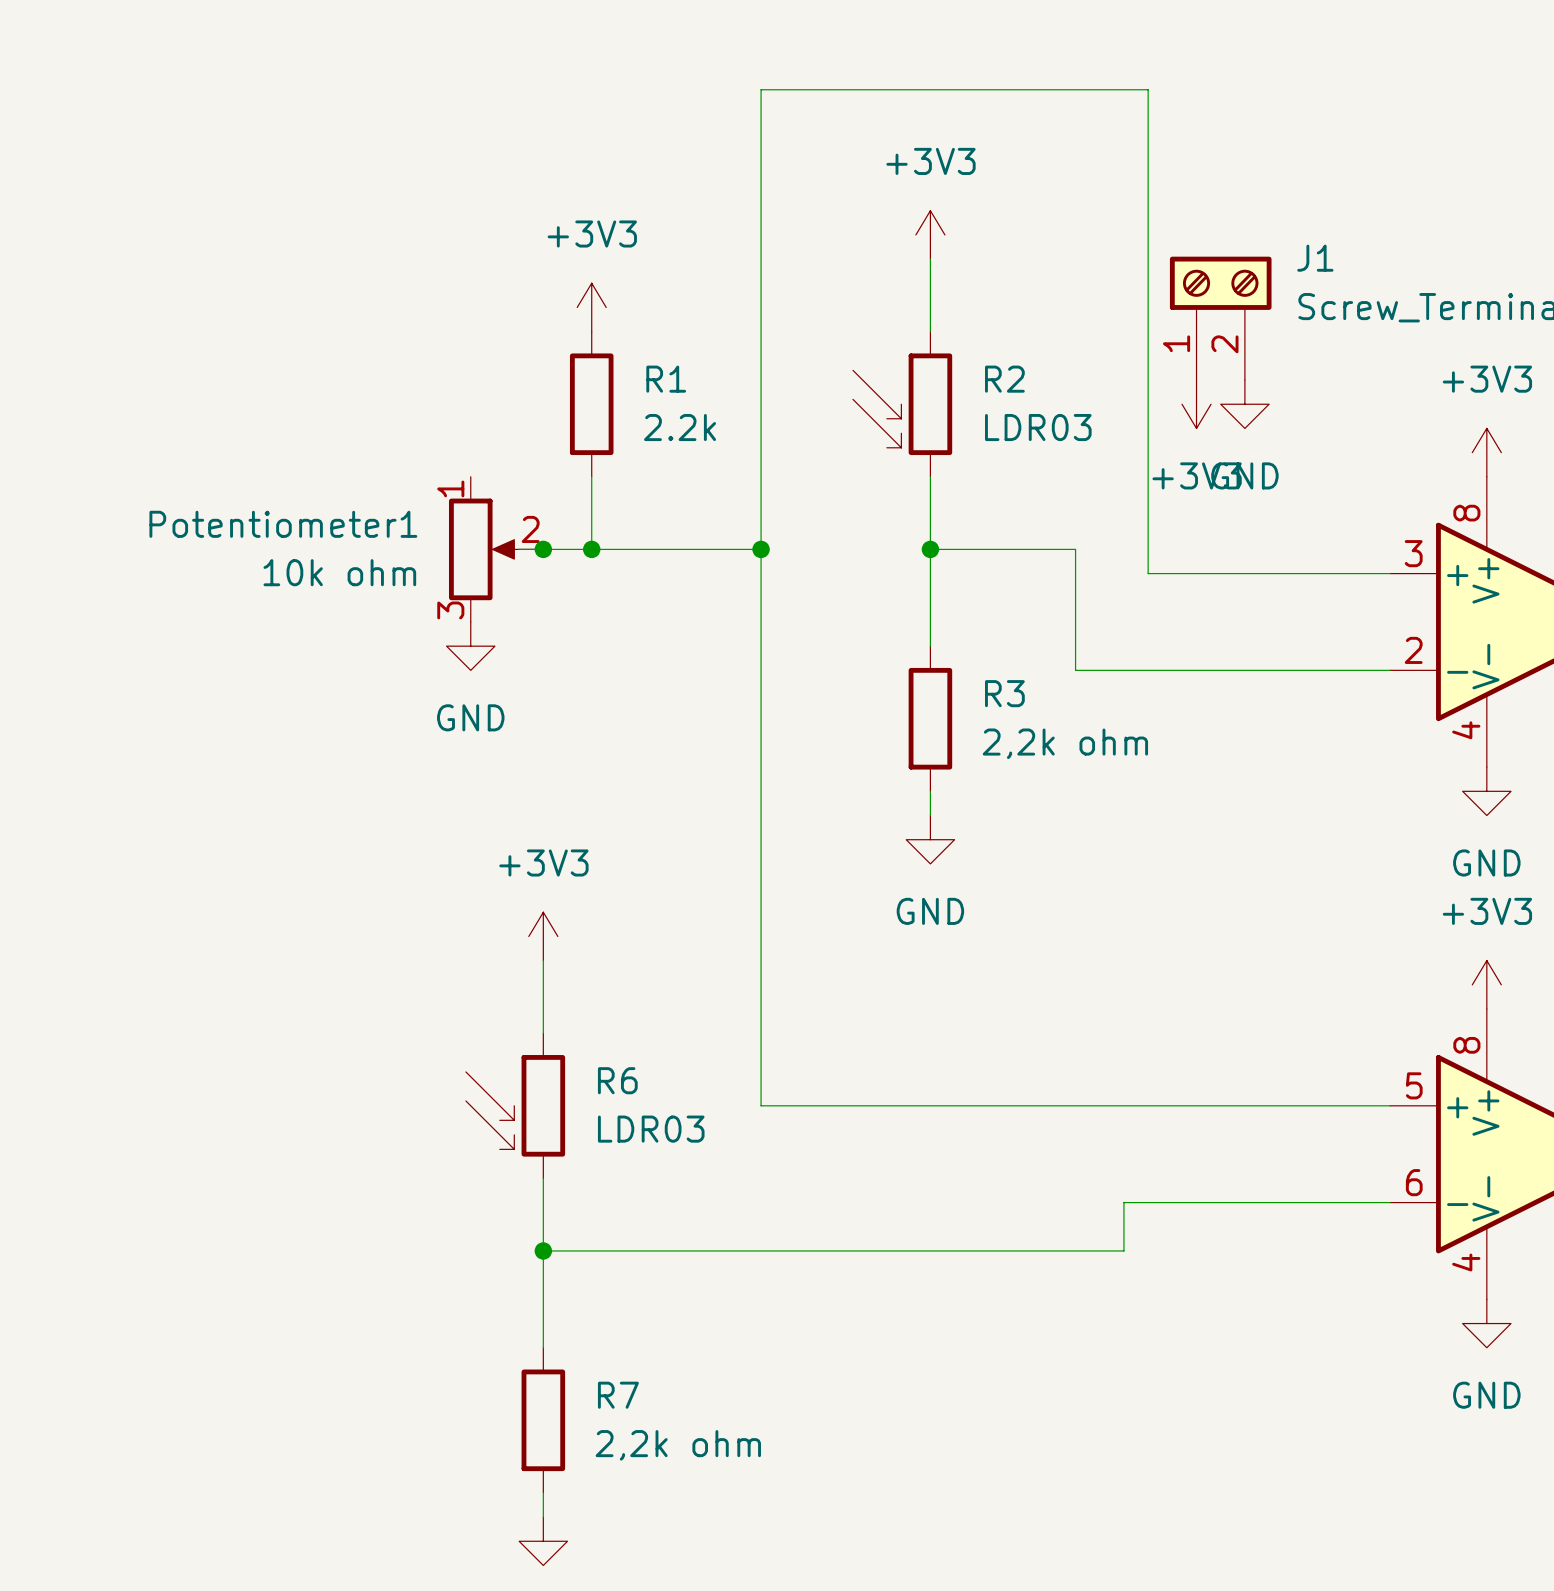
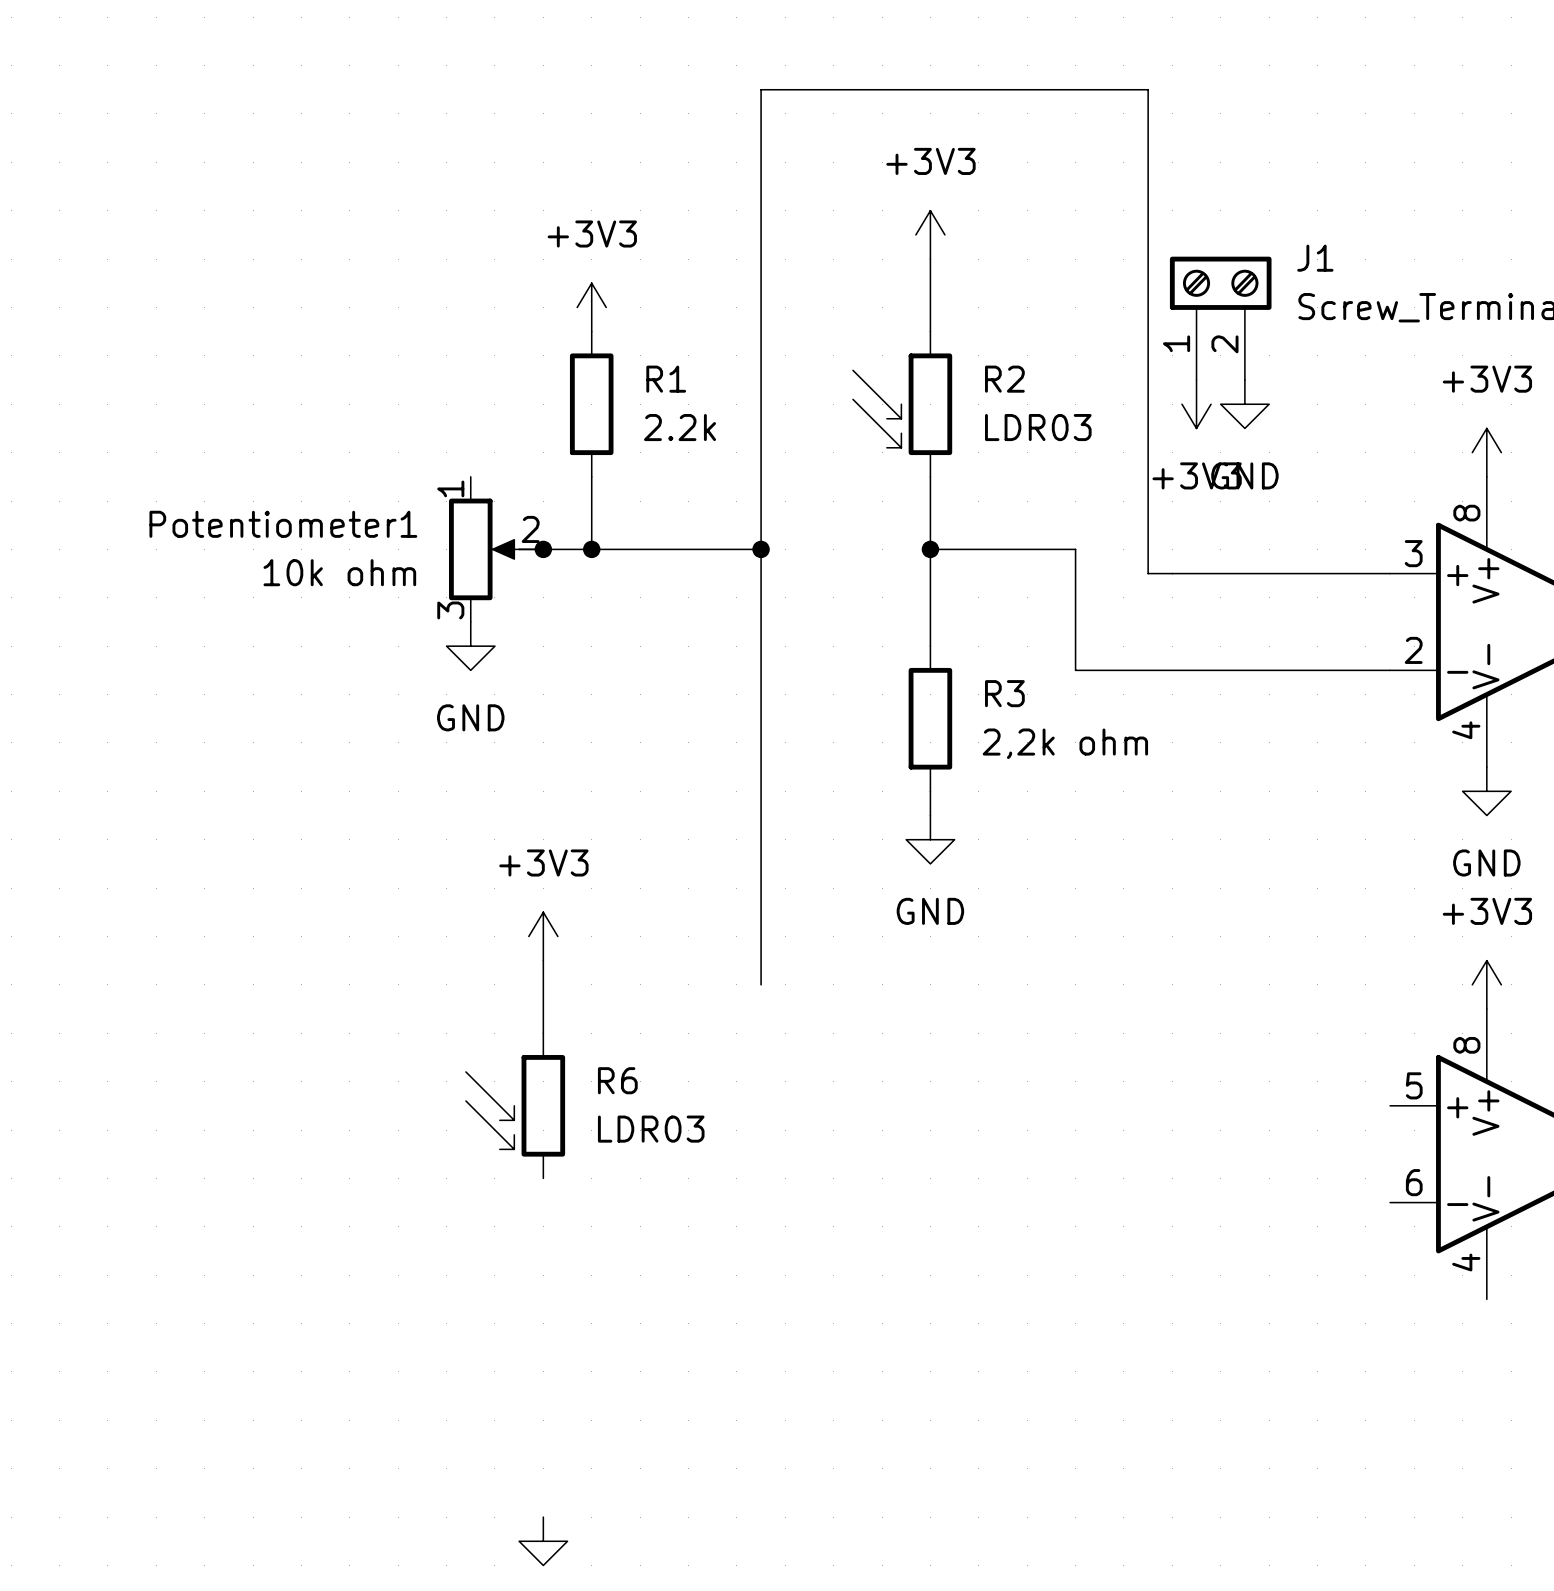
wire: (761, 984) (761, 1105) (1390, 1105) -> none
wire: (543, 1178) (543, 1347) -> none
wire: (1390, 1202) (1123, 1202) (1123, 1250) (543, 1250) -> none
junction: (543, 1250) -> none
power symbol: GND (1486, 1323) -> none
R7: 2,2k ohm (543, 1420) -> none
wire: (543, 1492) (543, 1517) -> none

